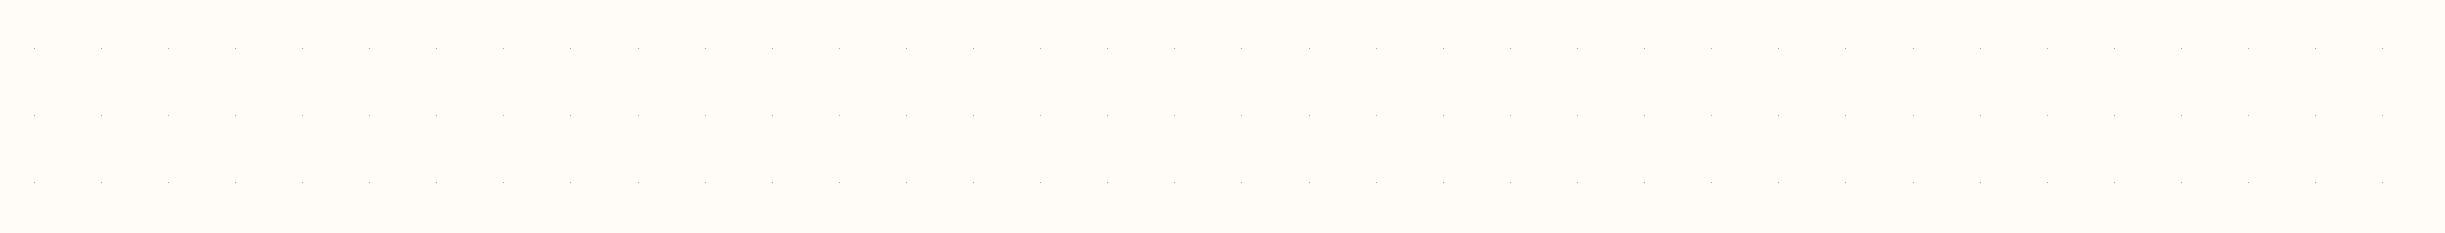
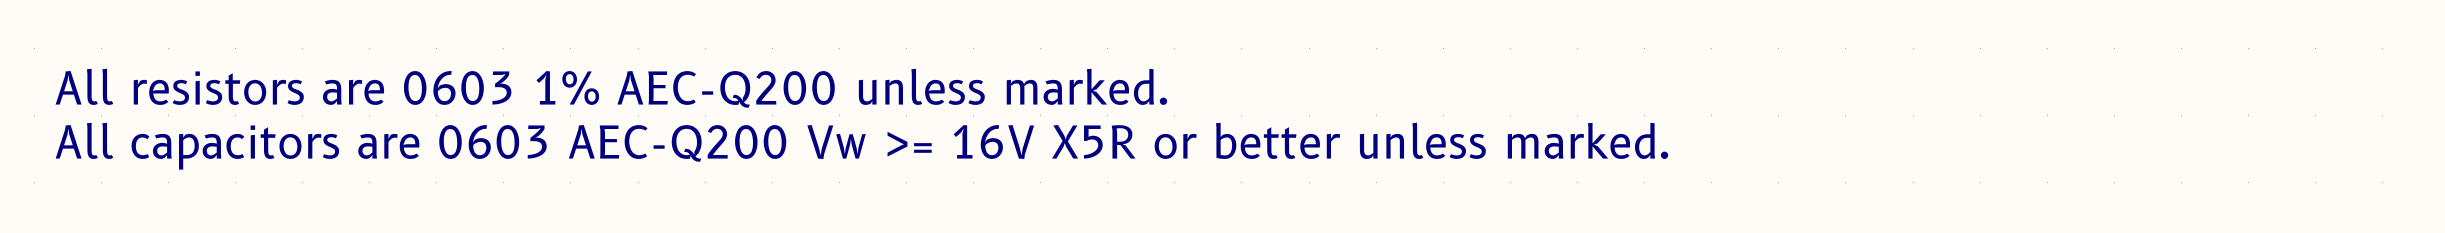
text: none -> All resistors are 0603 1% AEC-Q200 unless marked. (611, 88)
text: none -> All capacitors are 0603 AEC-Q200 Vw >= 16V X5R or better unless marked. (861, 146)

